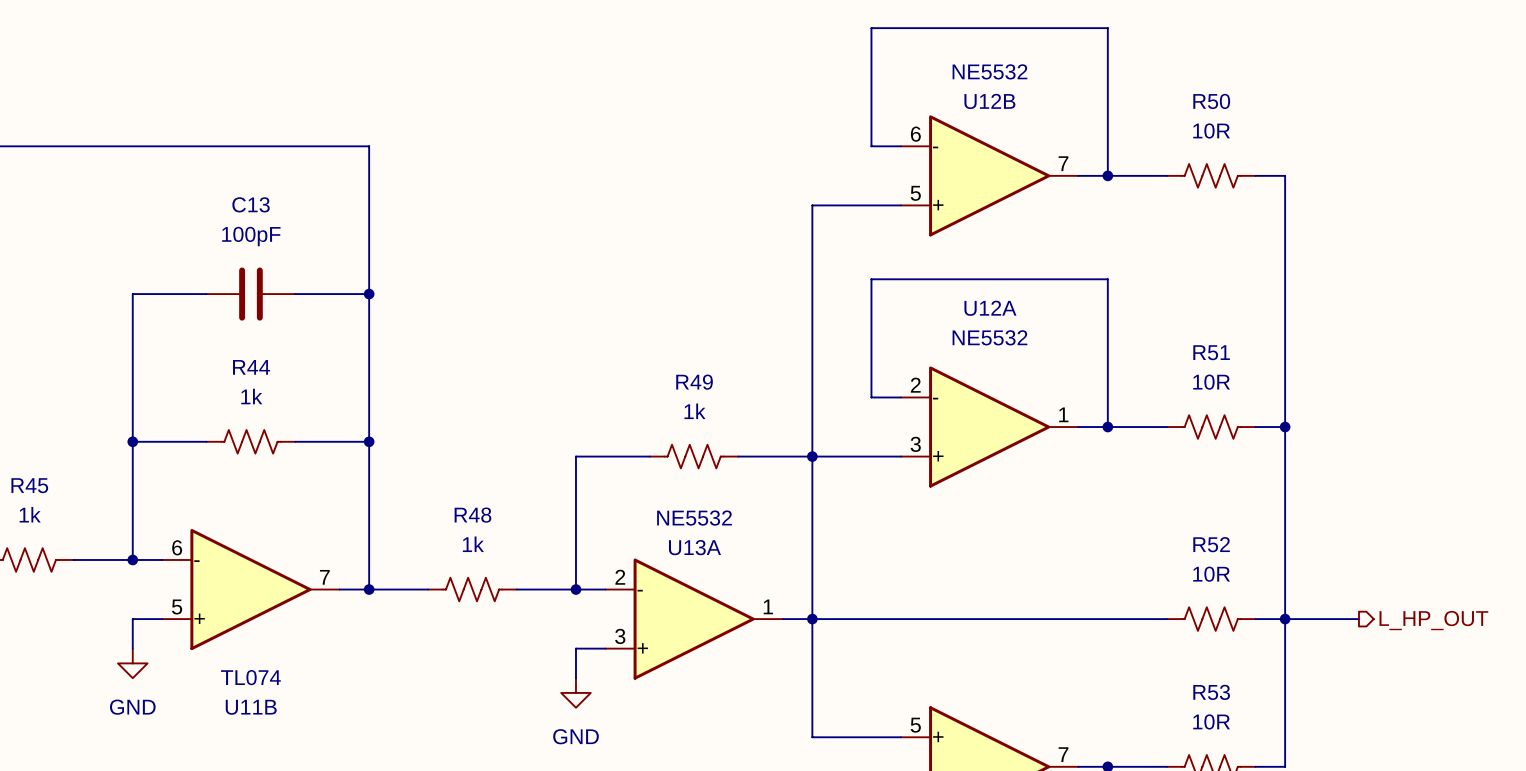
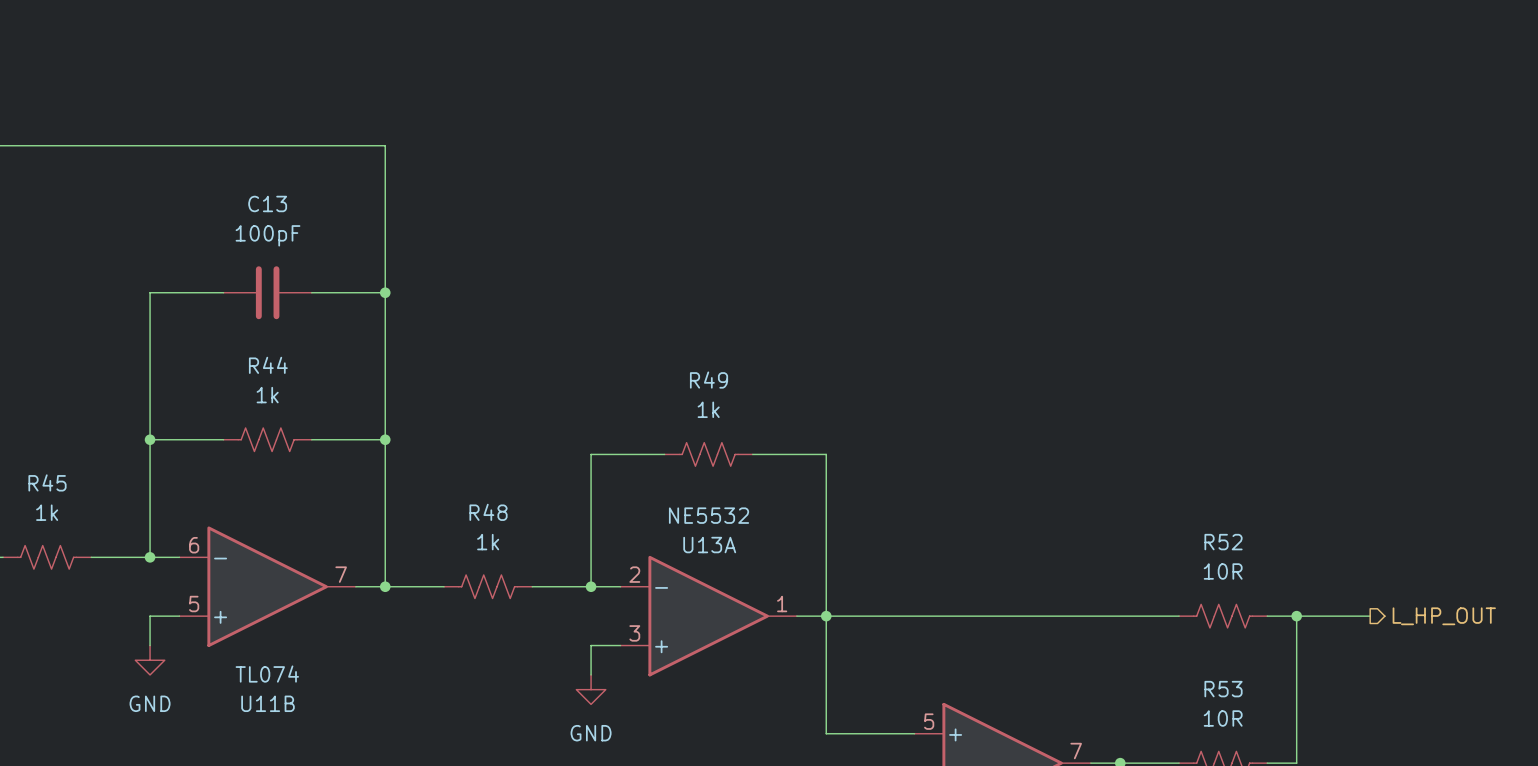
wire: (901, 146) (871, 146) (871, 28) (1107, 28) (1107, 175) -> none
U12B: NE5532 (989, 175) -> none
wire: (1078, 175) (1166, 175) -> none
junction: (1107, 175) -> none
R50: 10R (1211, 175) -> none
wire: (1255, 175) (1285, 175) (1285, 619) -> none
wire: (901, 205) (812, 205) (812, 456) (901, 456) -> none
wire: (901, 397) (871, 397) (871, 279) (1107, 279) (1107, 427) -> none
U12A: NE5532 (989, 427) -> none
wire: (1078, 427) (1166, 427) -> none
junction: (1107, 427) -> none
R51: 10R (1211, 427) -> none
wire: (1255, 427) (1285, 427) -> none
junction: (1285, 427) -> none
junction: (812, 456) -> none

